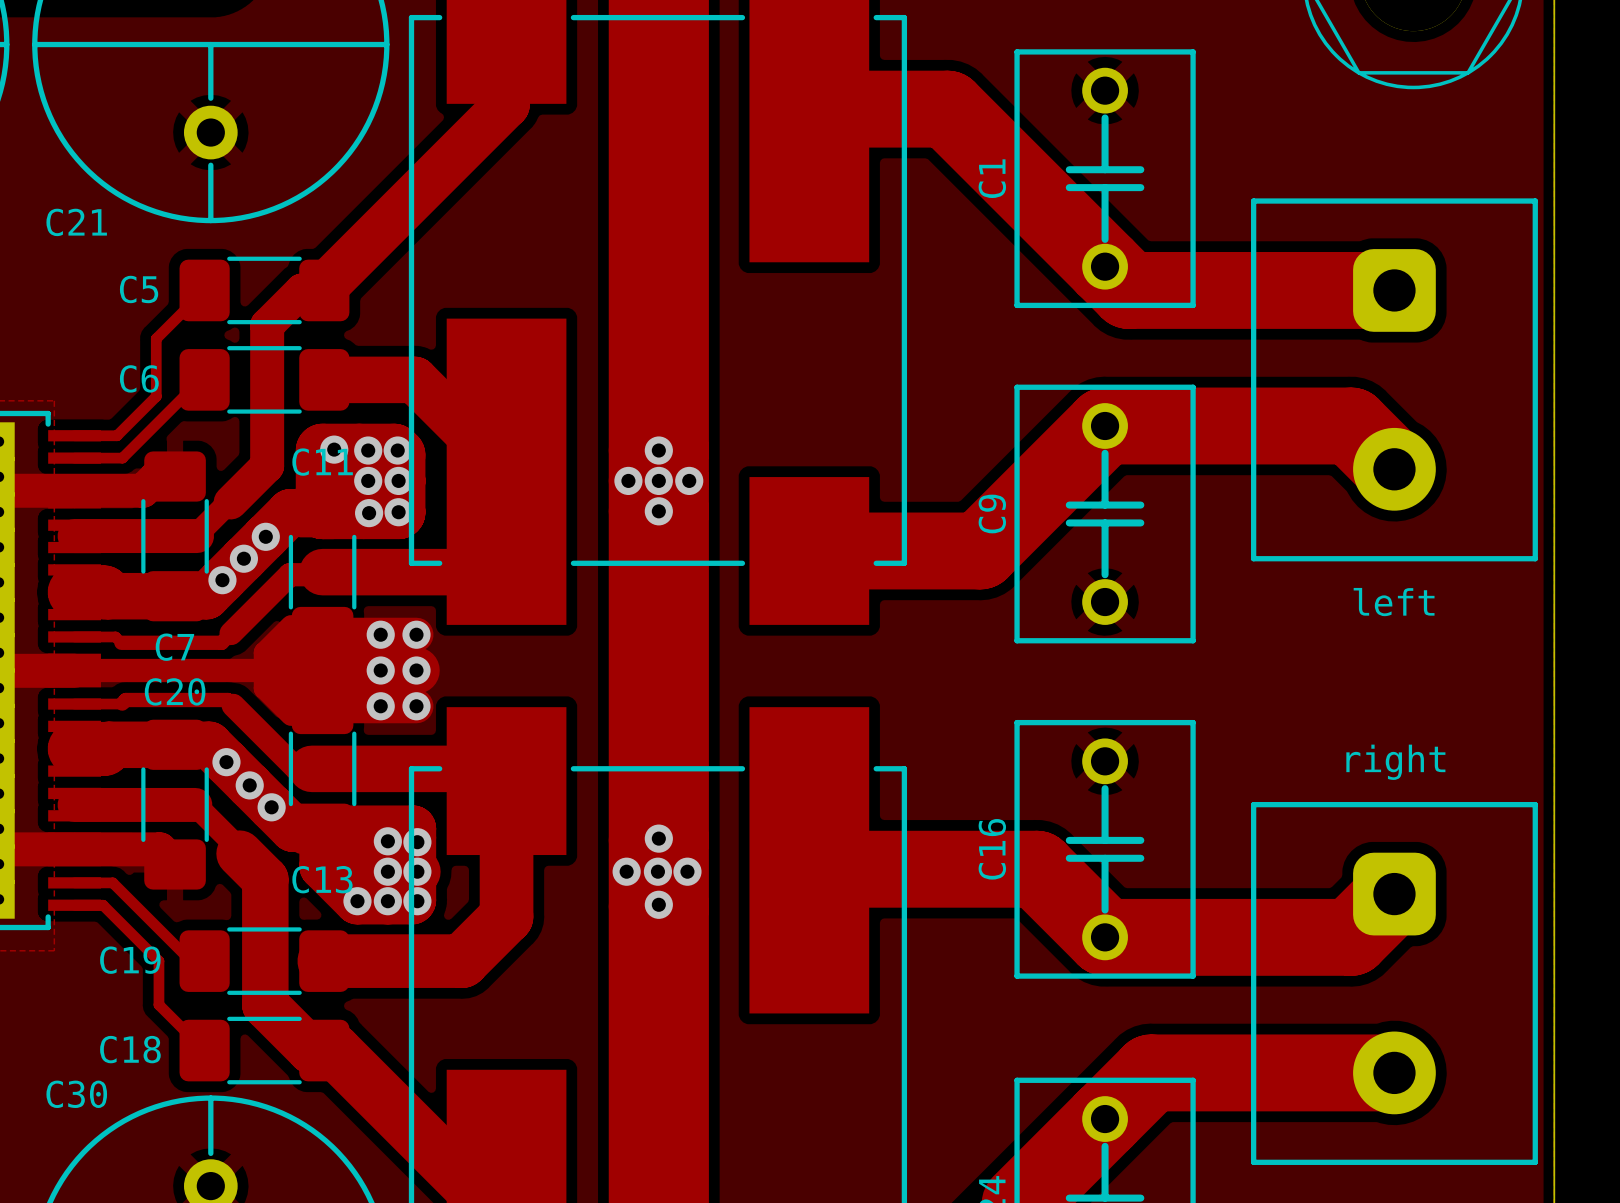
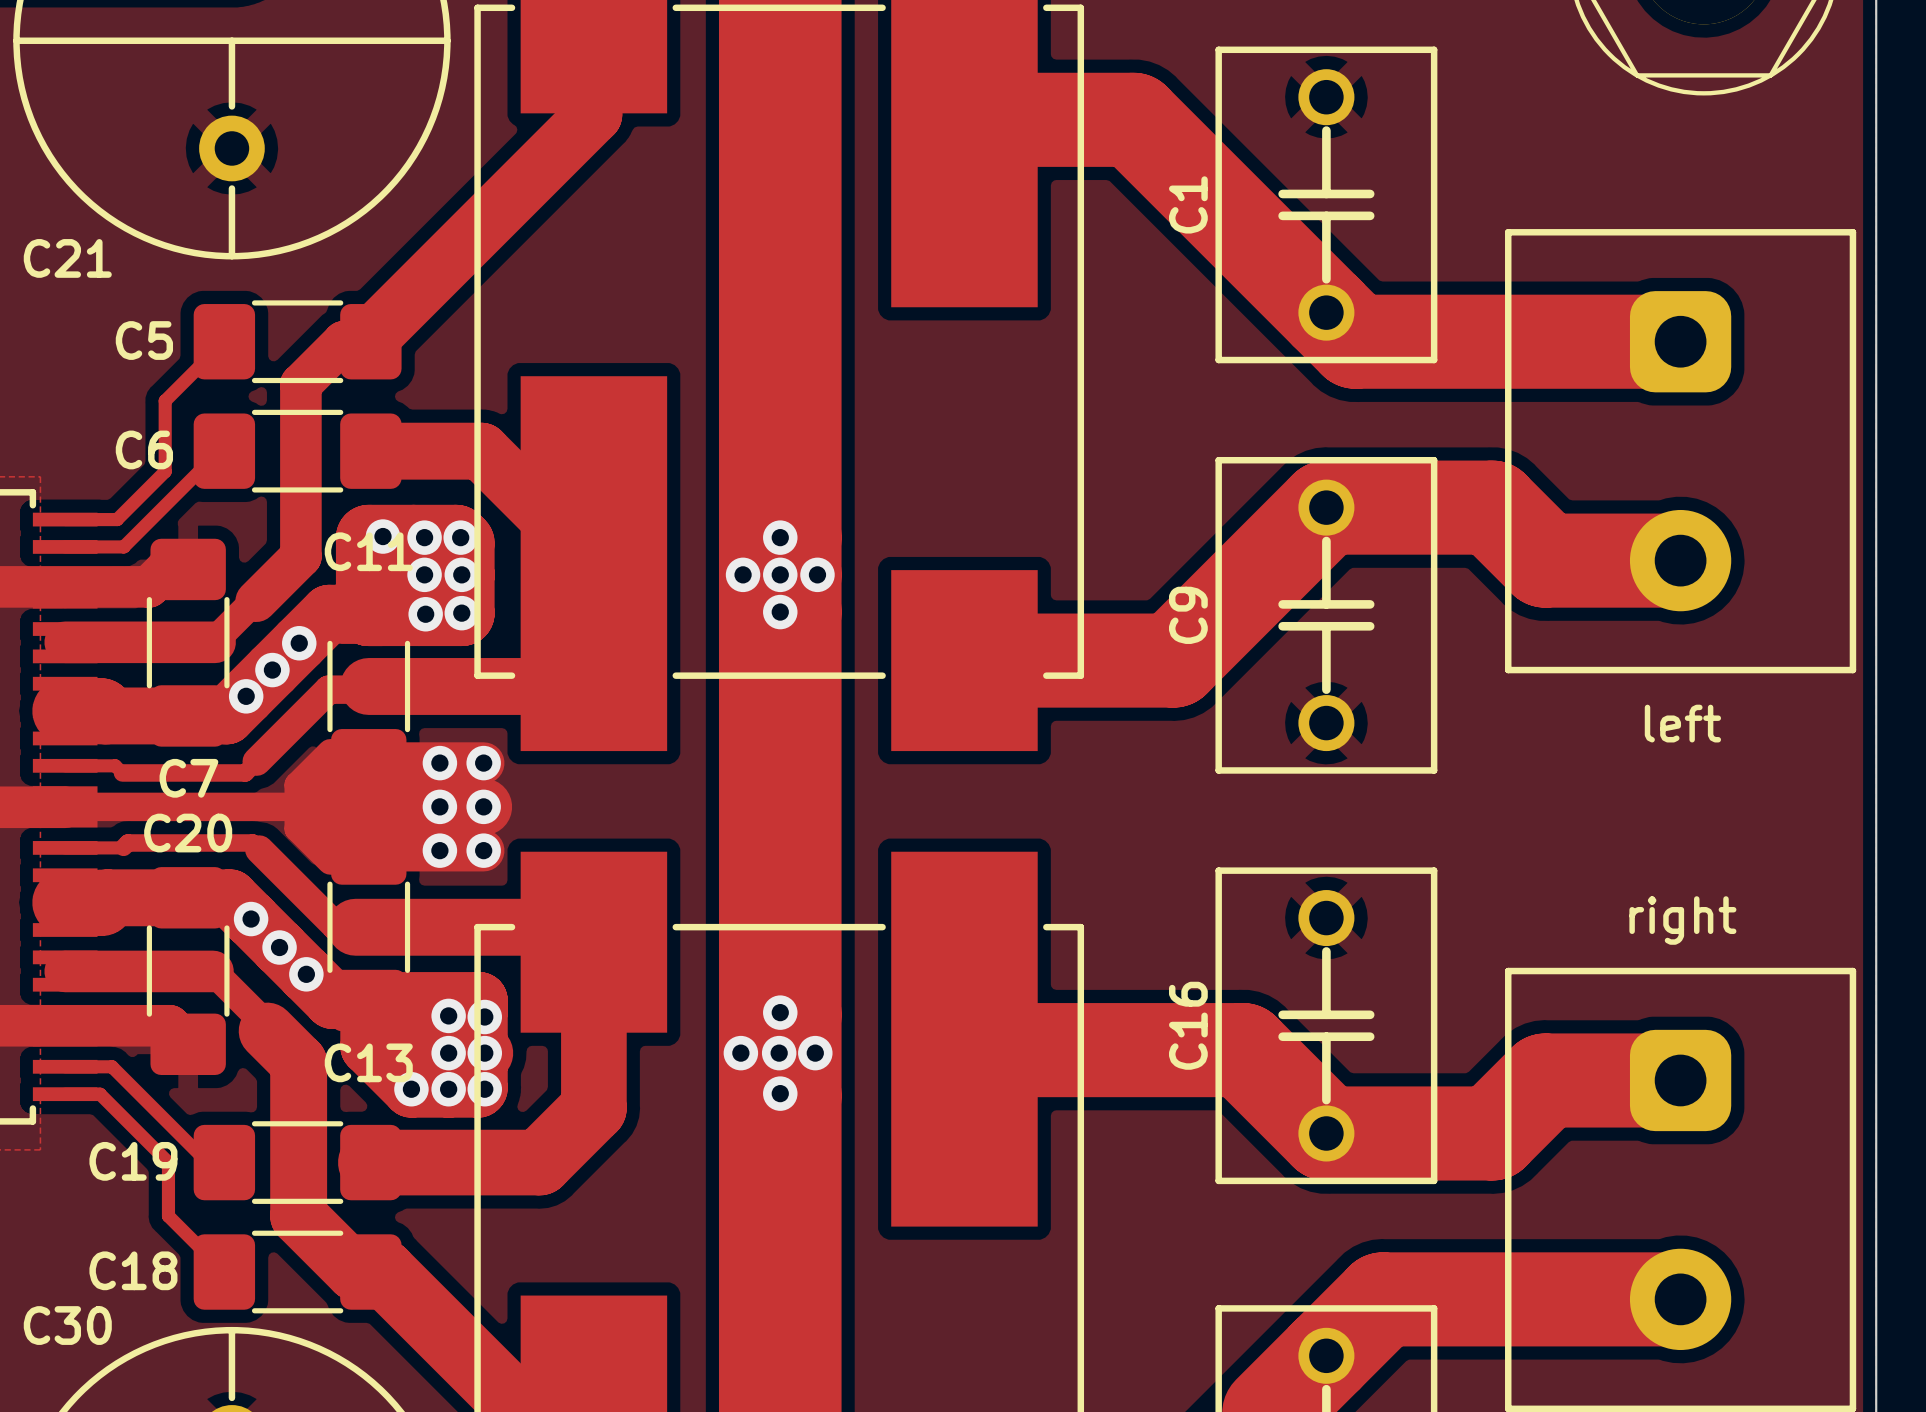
track: (1240, 425) (1351, 425) (1394, 469) -> (1492, 507) (1545, 560) (1680, 560)
track: (1394, 894) (1351, 937) (1240, 937) -> (1680, 1080) (1545, 1080) (1492, 1133)

